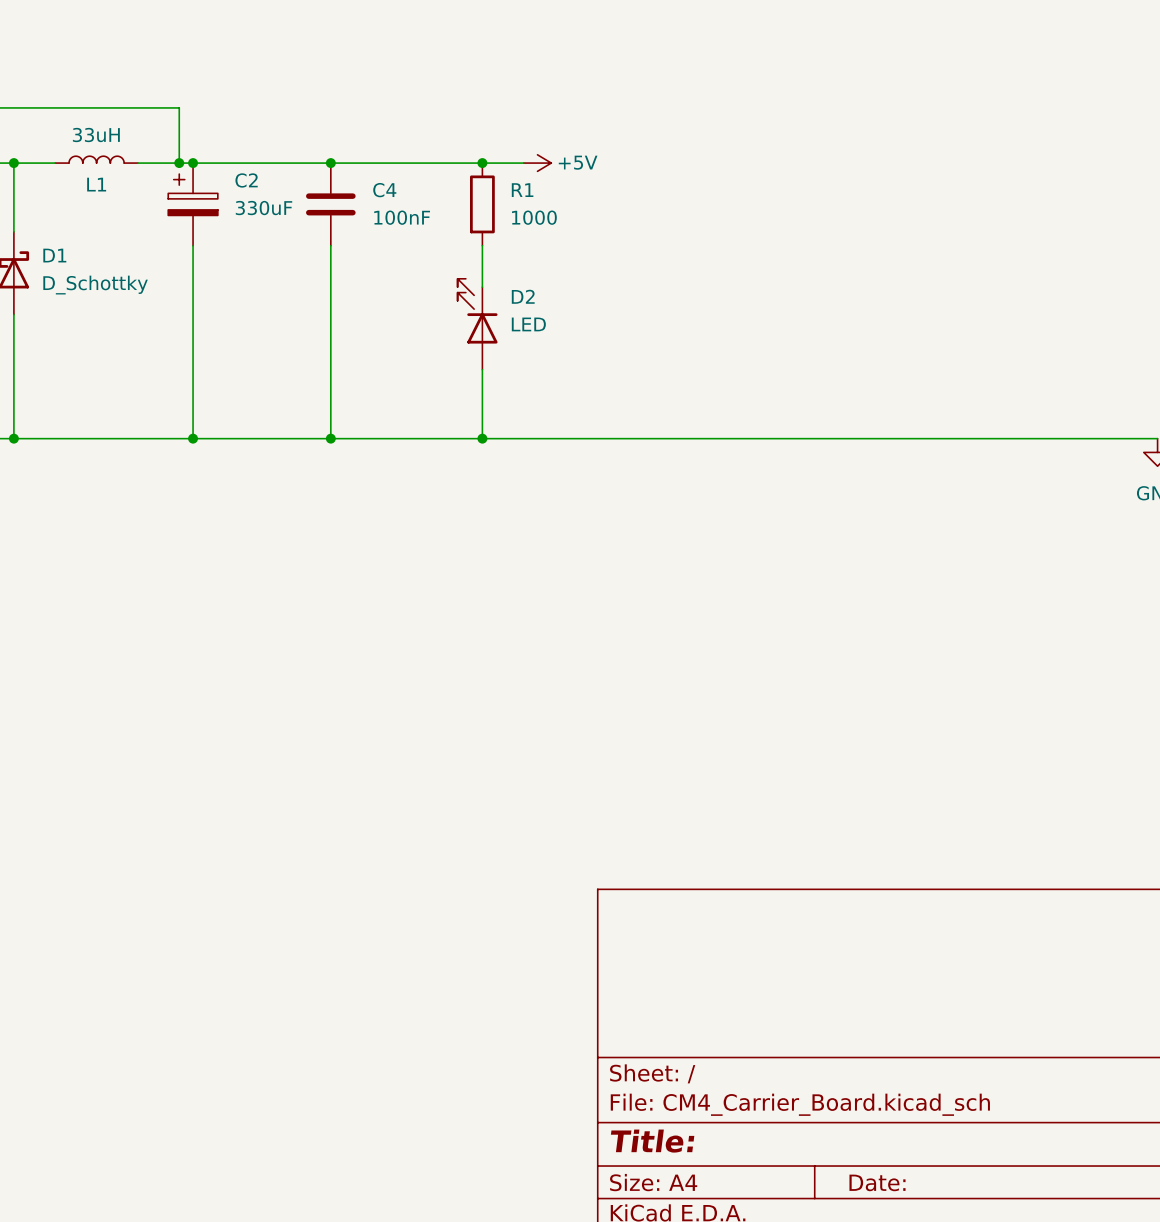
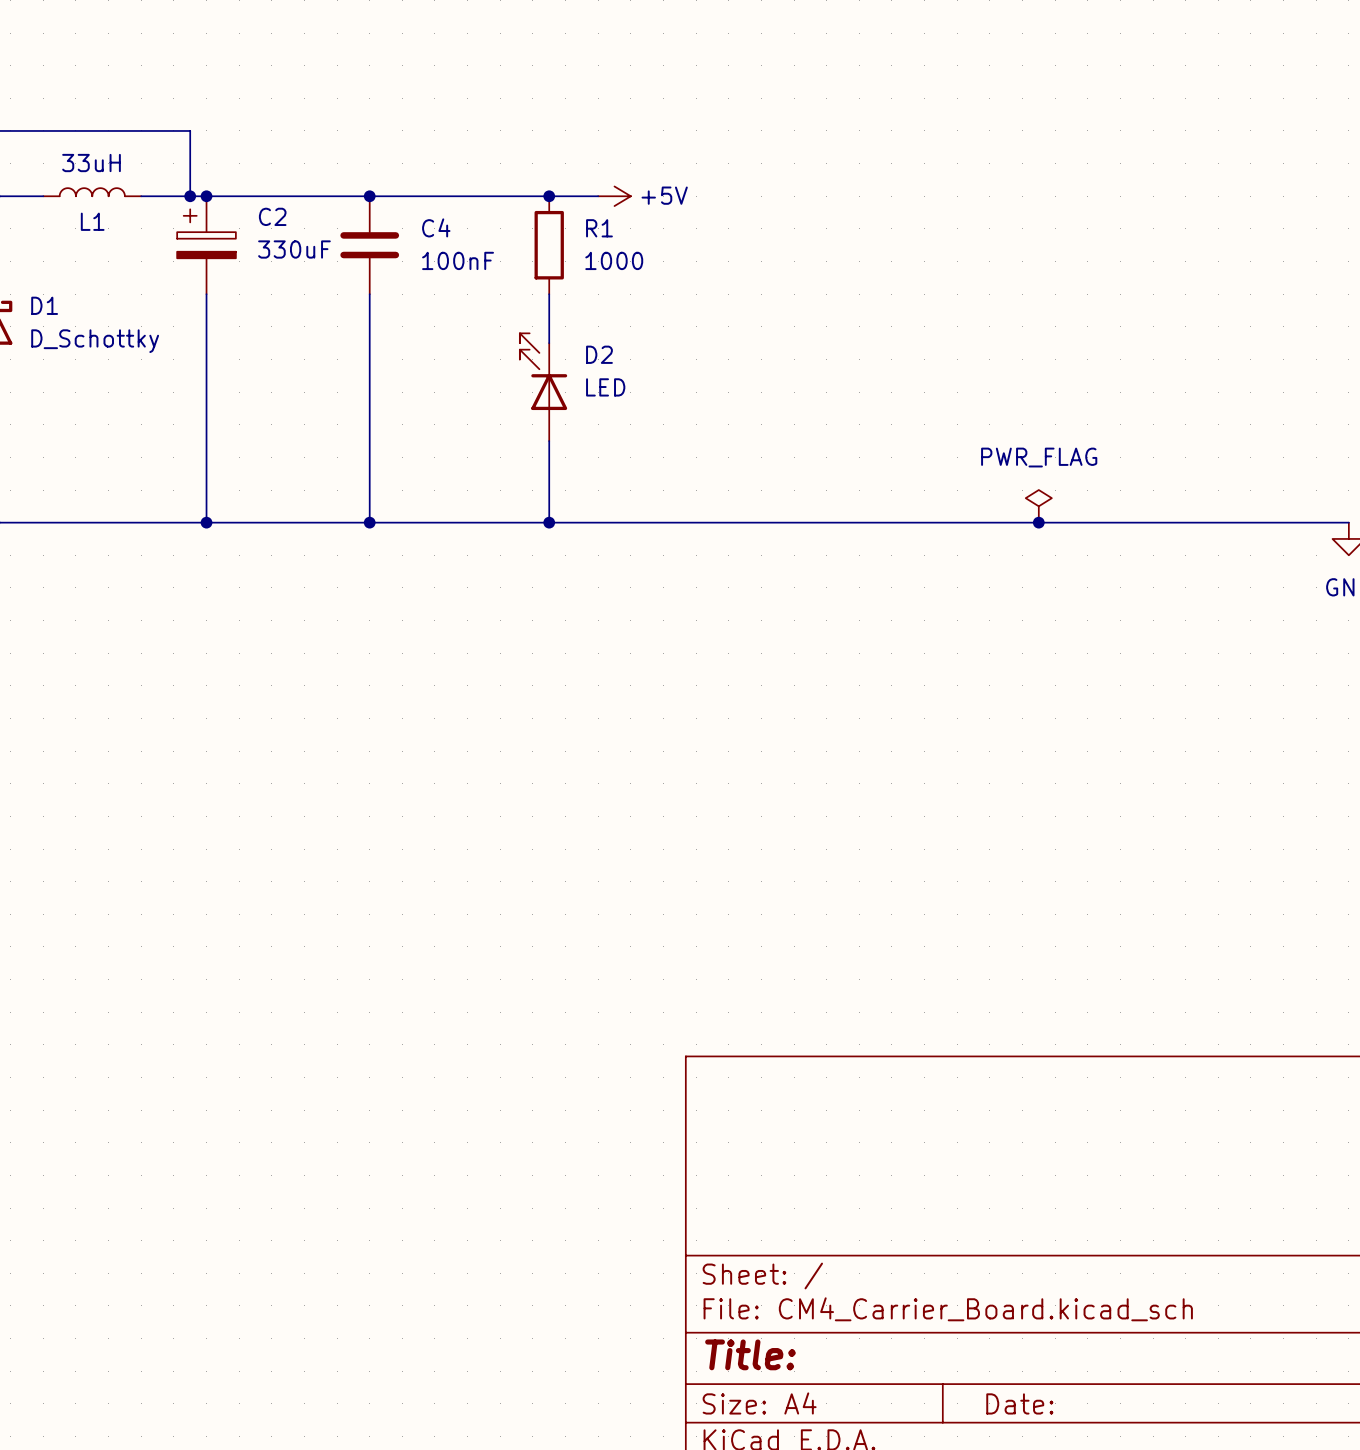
power symbol: none -> PWR_FLAG (1038, 506)
junction: none -> (1038, 522)

